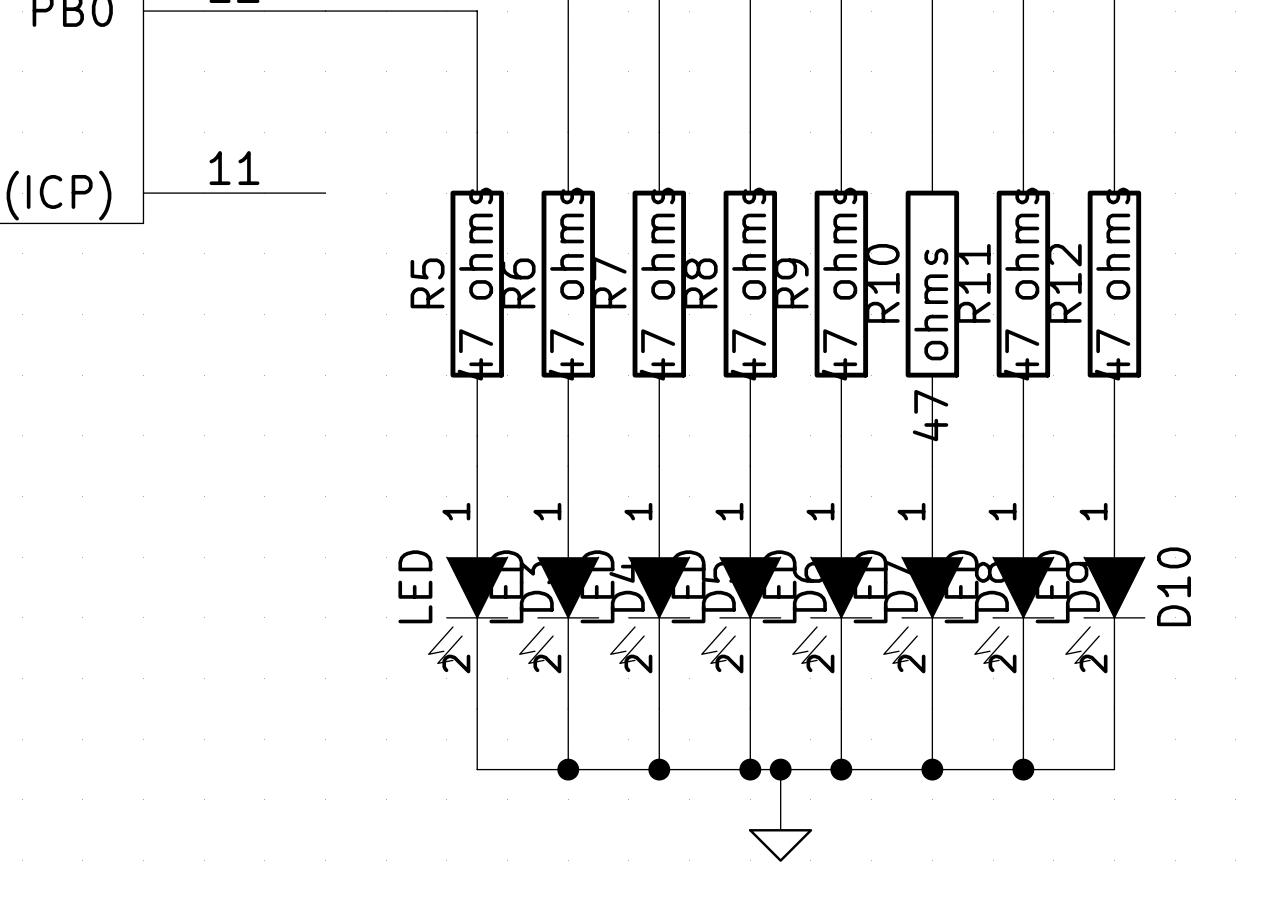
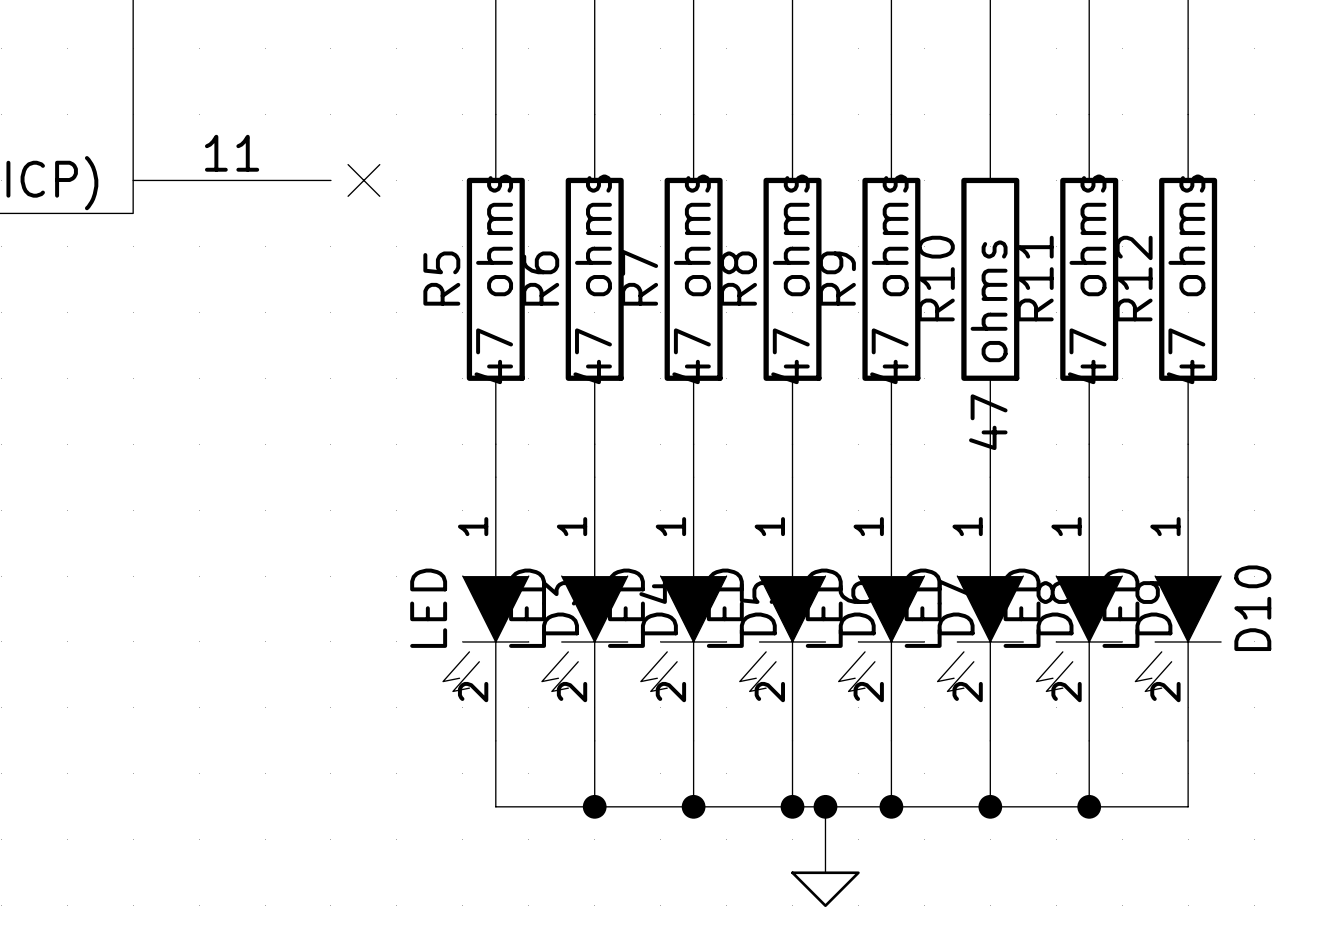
no-connect mark: none -> (363, 180)

